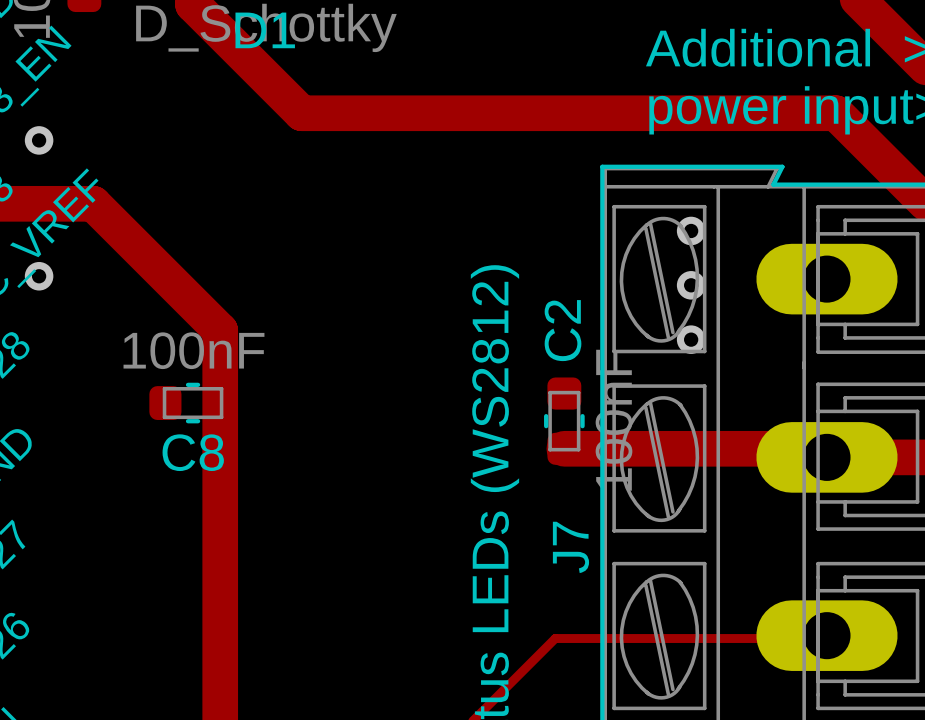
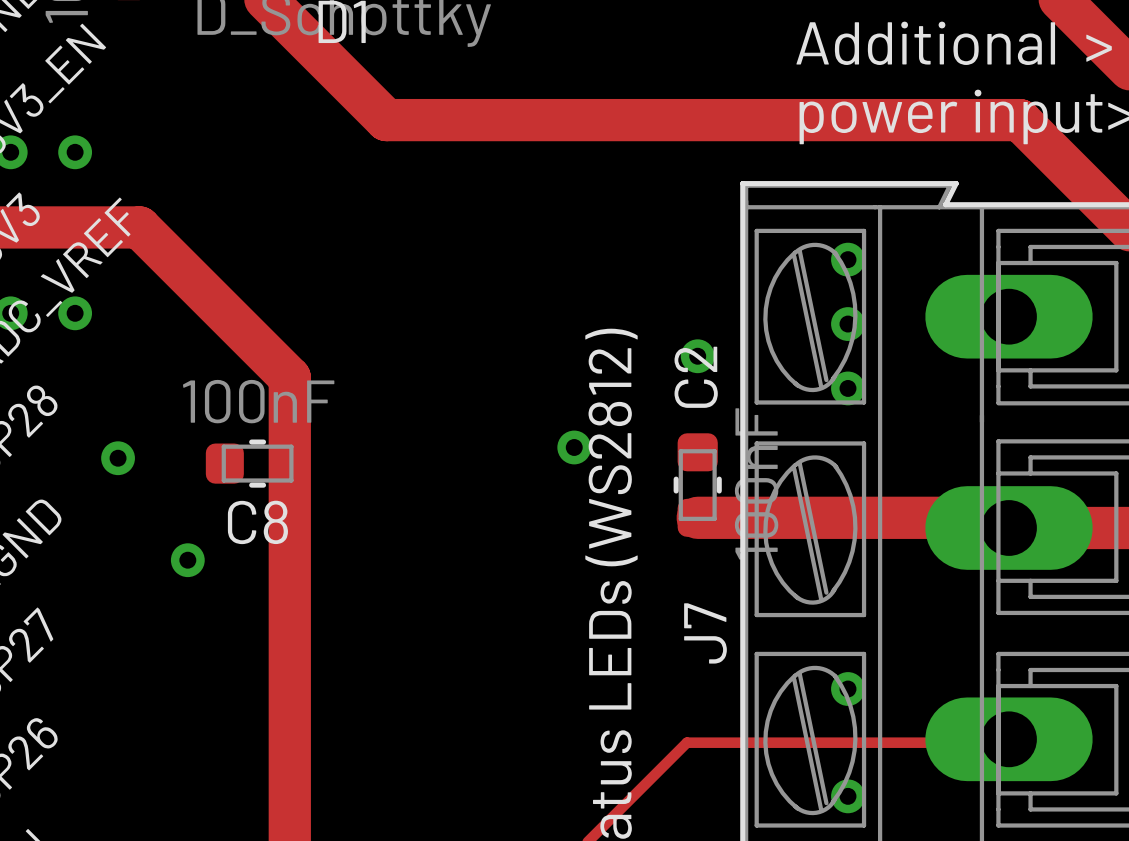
via: none -> (697, 356)
via: none -> (574, 447)
via: none -> (118, 458)
via: none -> (187, 560)
via: none -> (847, 689)
via: none -> (847, 796)

